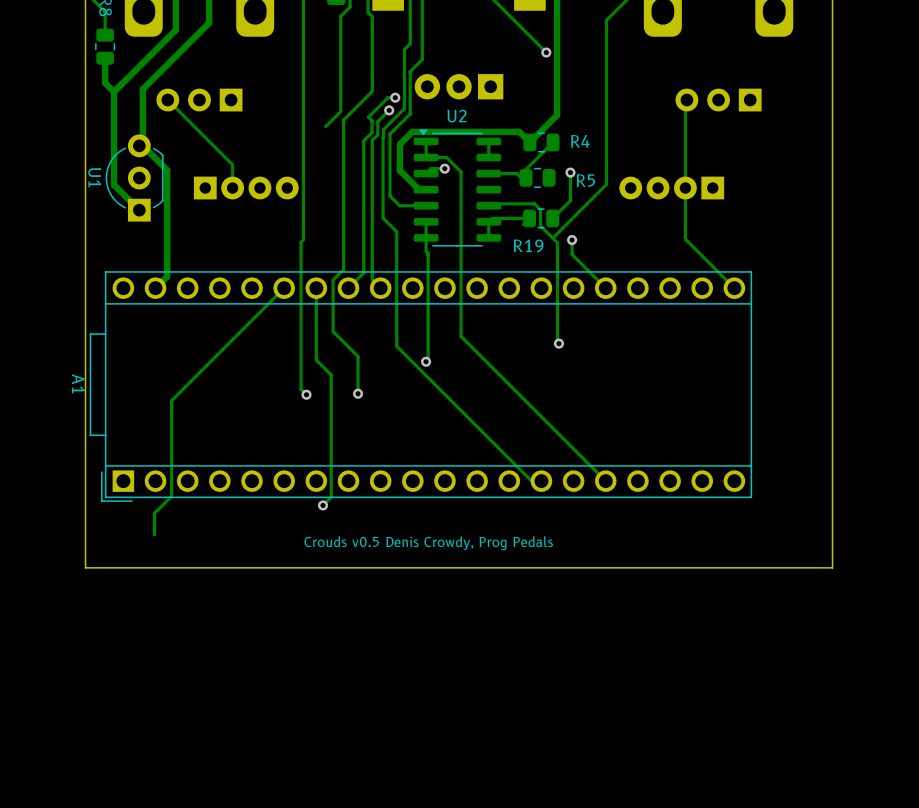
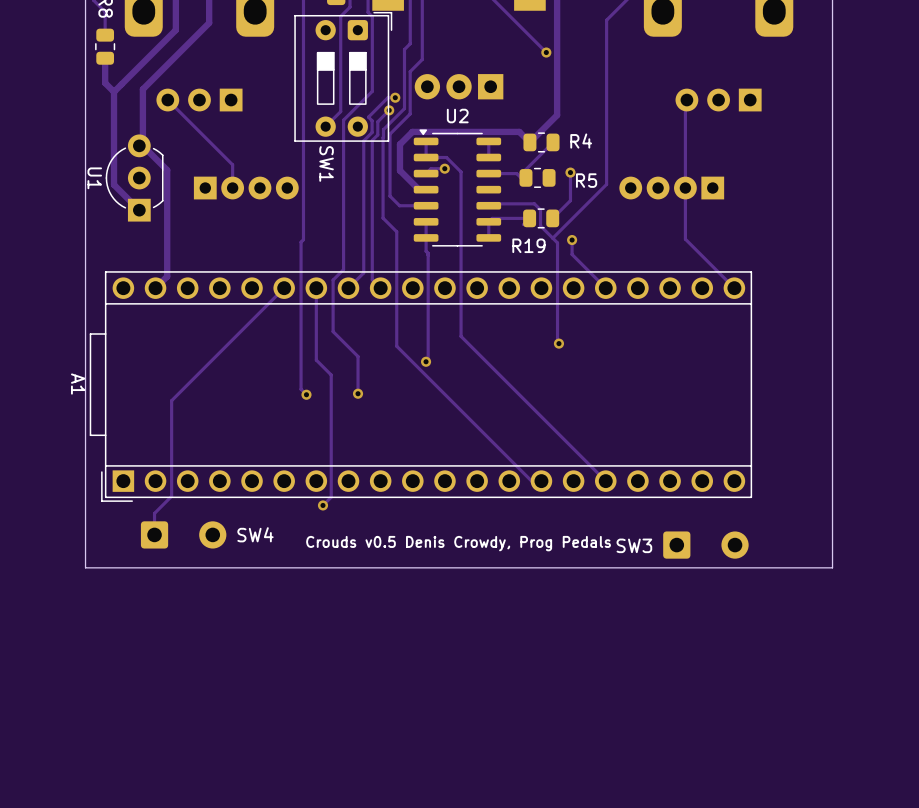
SW1: none -> (343, 76)
SW4: none -> (183, 534)
SW3: none -> (705, 545)

